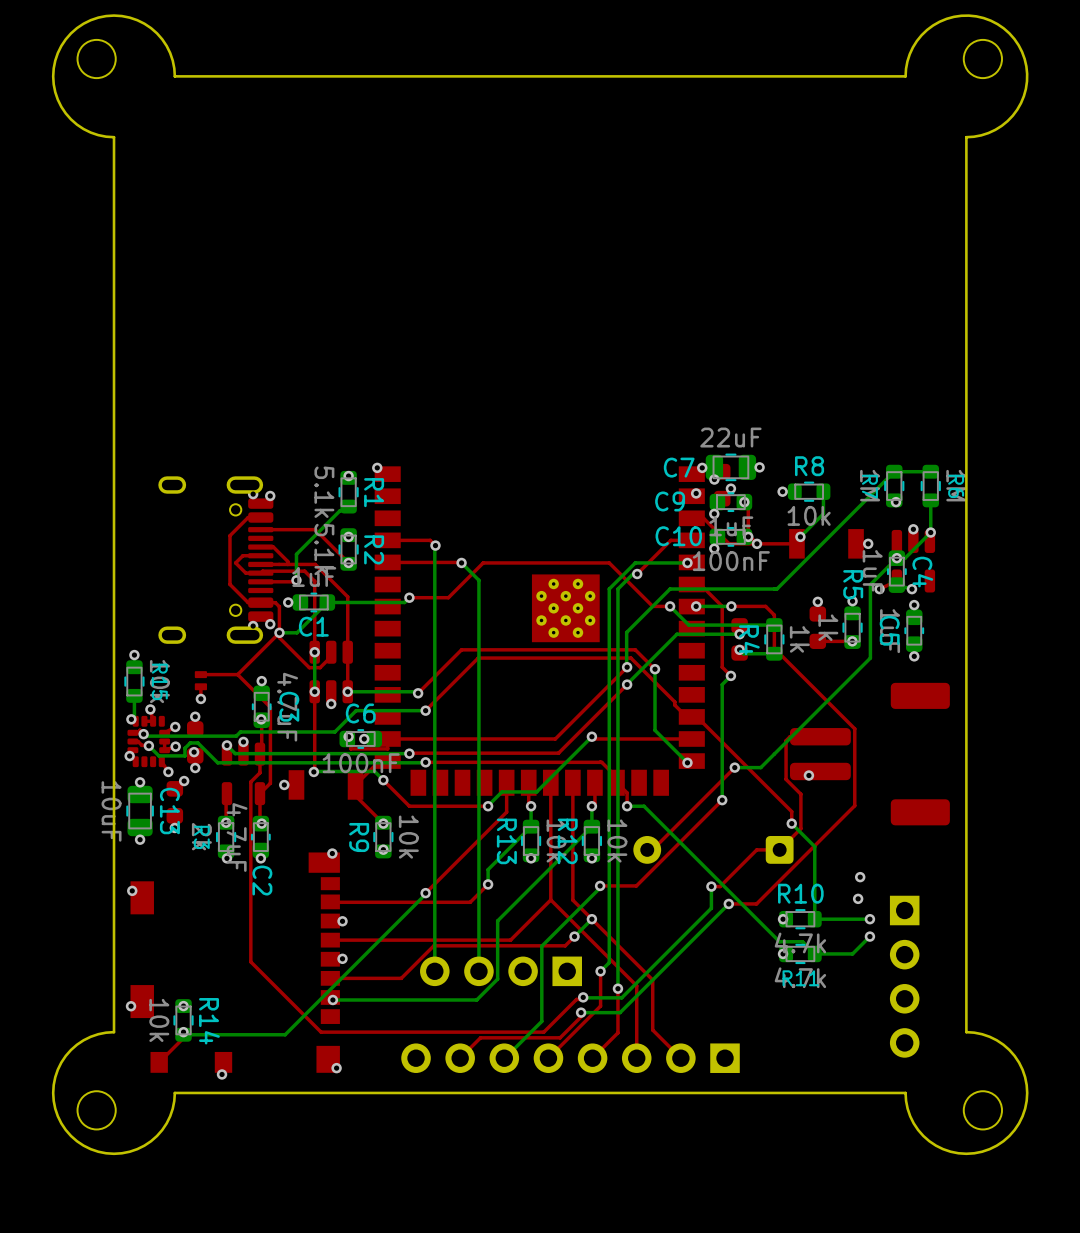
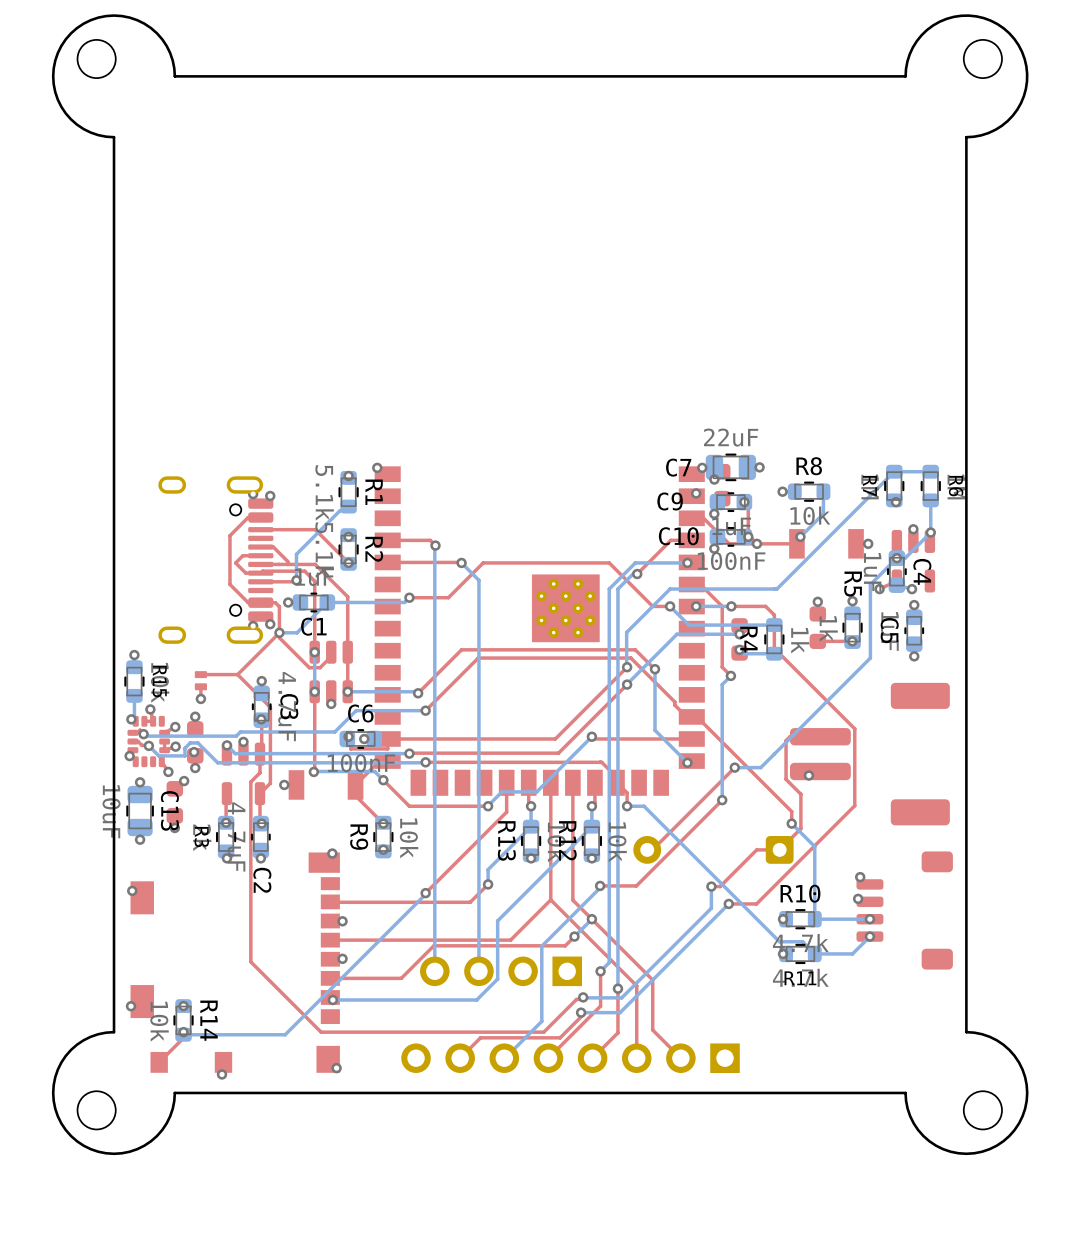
via: (730, 488) -> none
part: none -> (904, 910)
part: (904, 976) -> none

